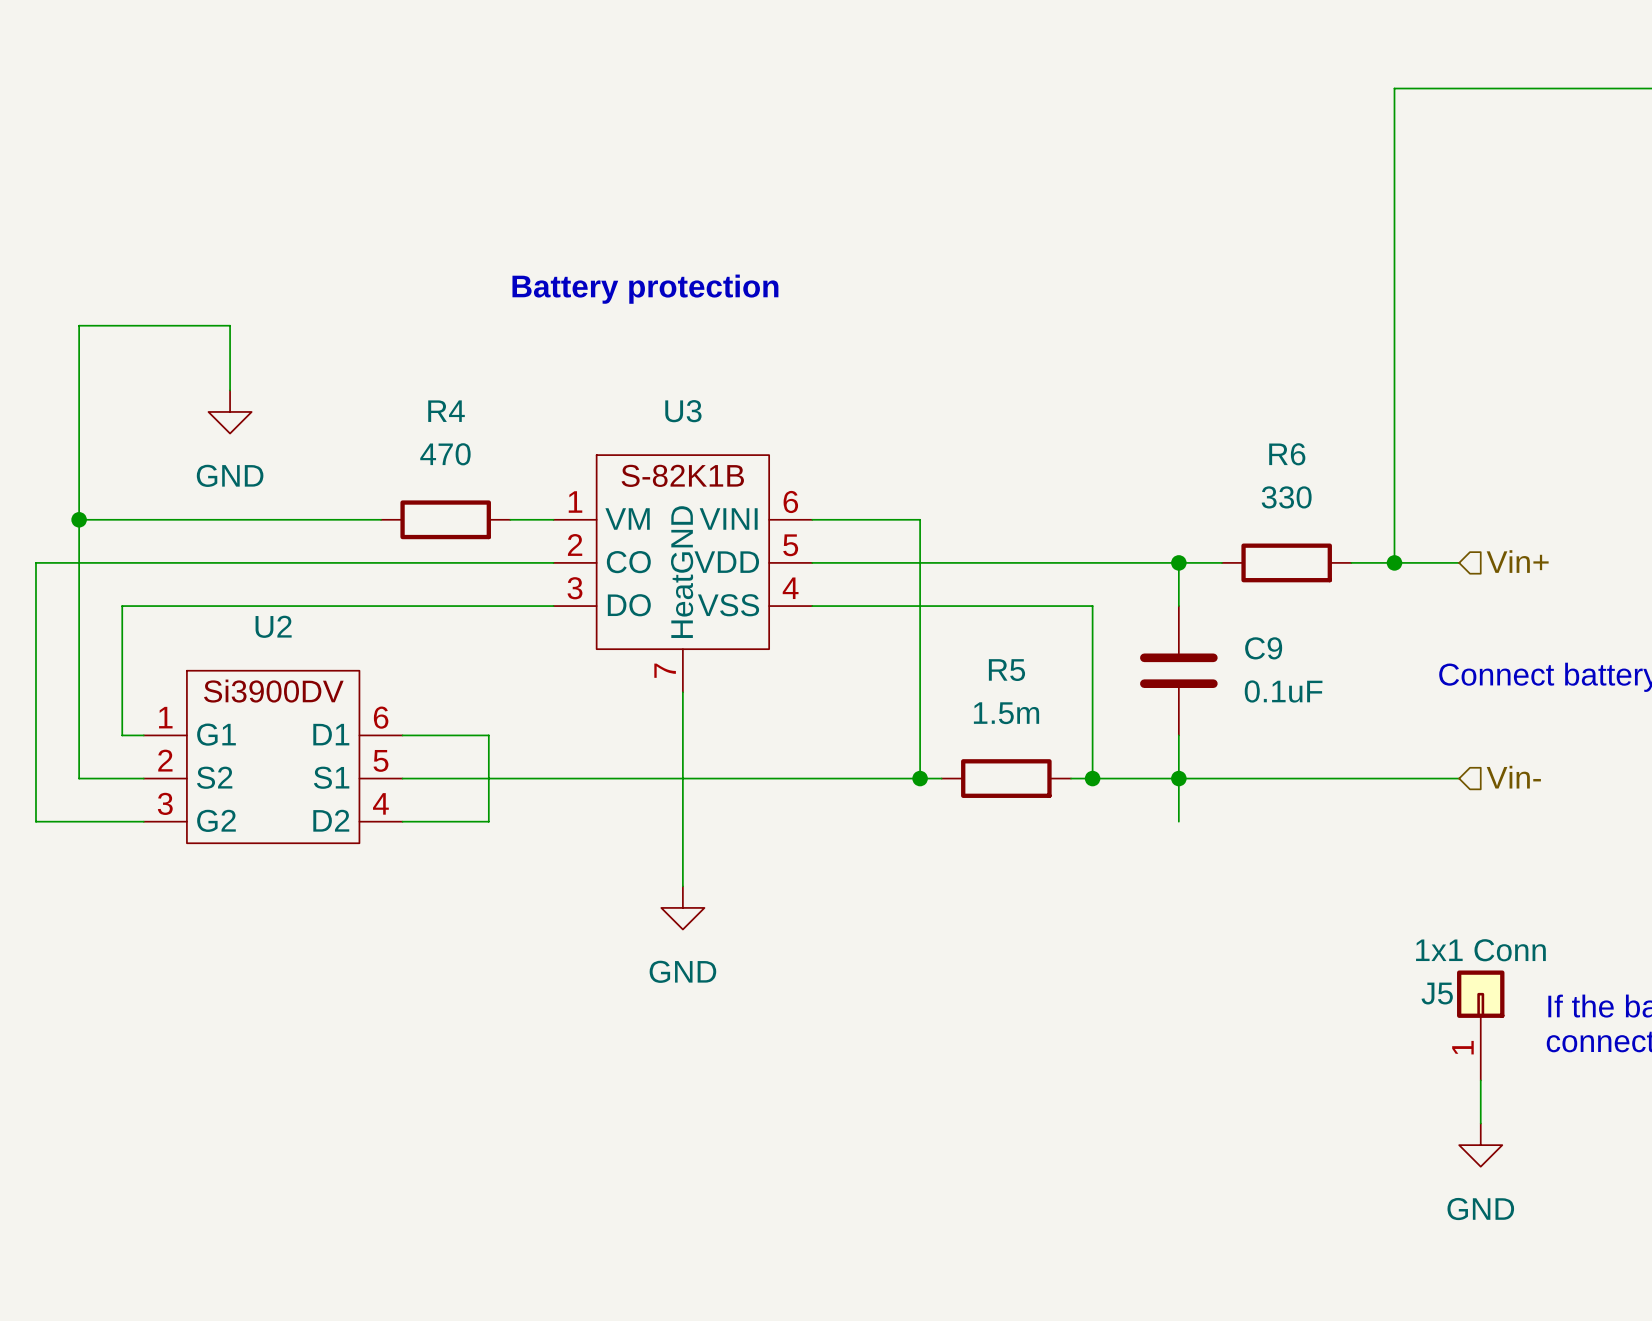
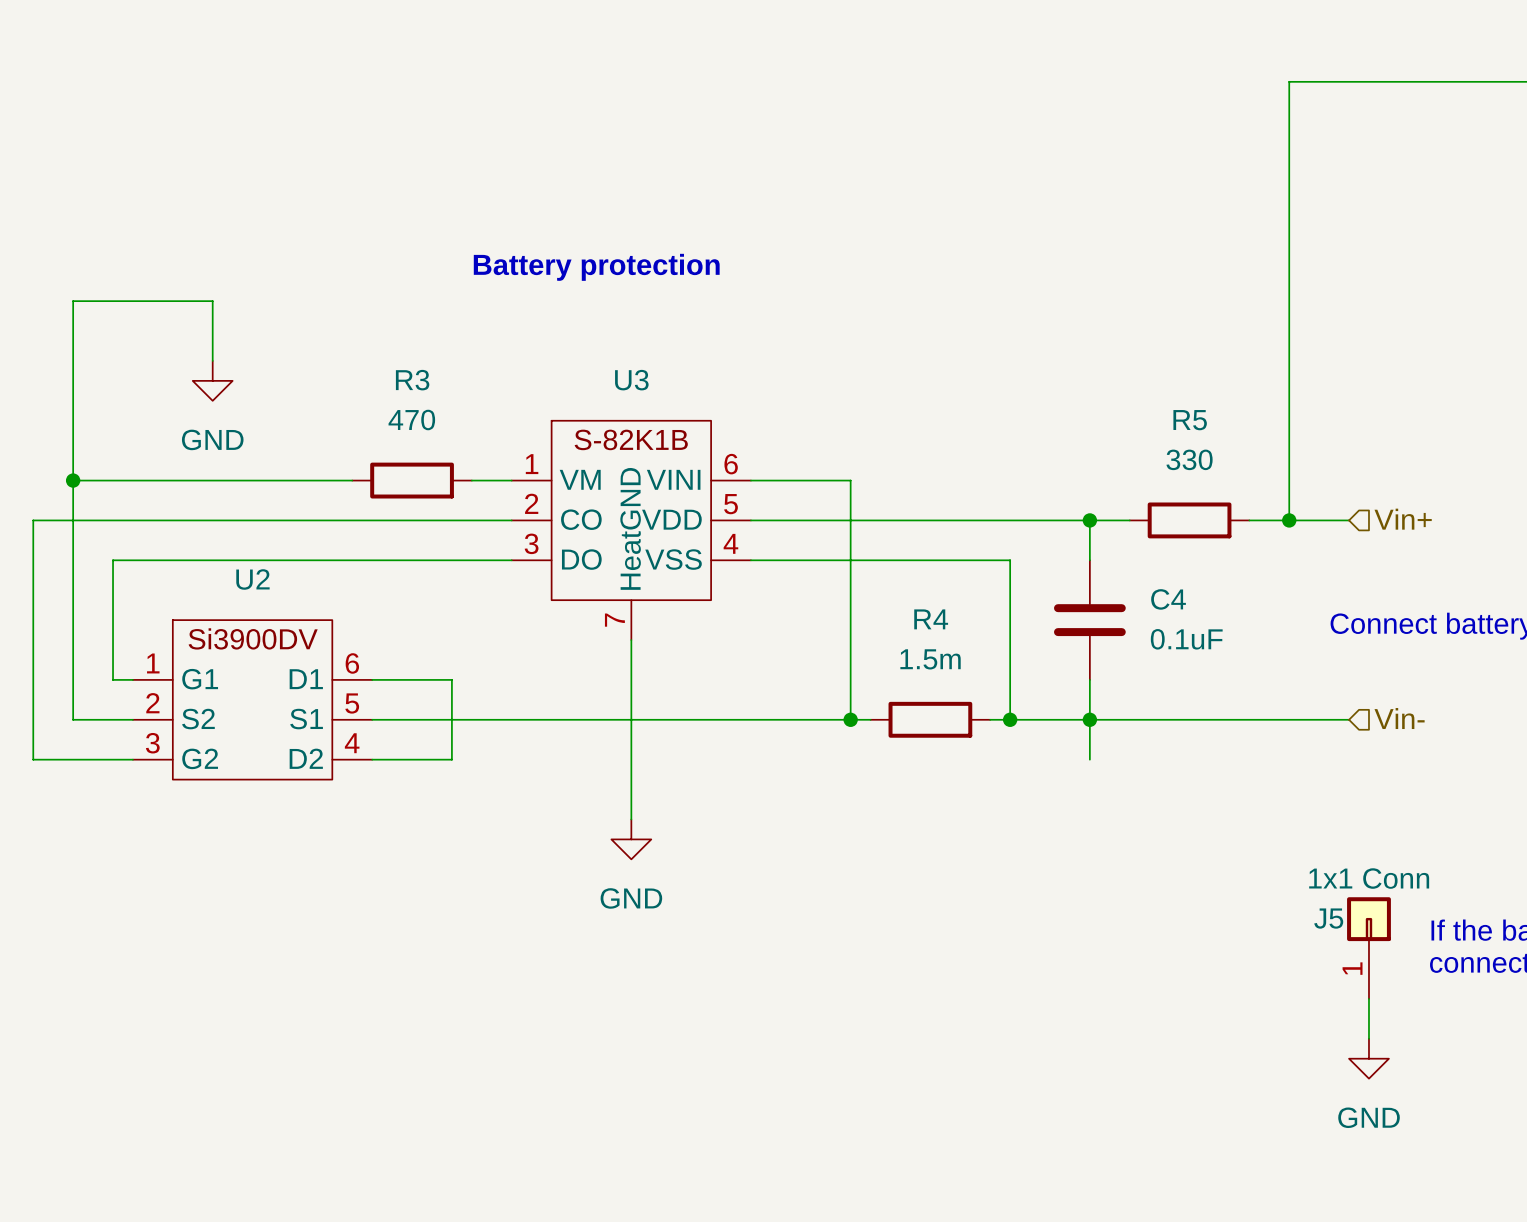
R4 name: R4 (446, 411) -> R3 (412, 380)
R6 name: R6 (1287, 454) -> R5 (1190, 420)
C9 name: C9 (1263, 648) -> C4 (1168, 599)
R5 name: R5 (1006, 670) -> R4 (931, 619)

